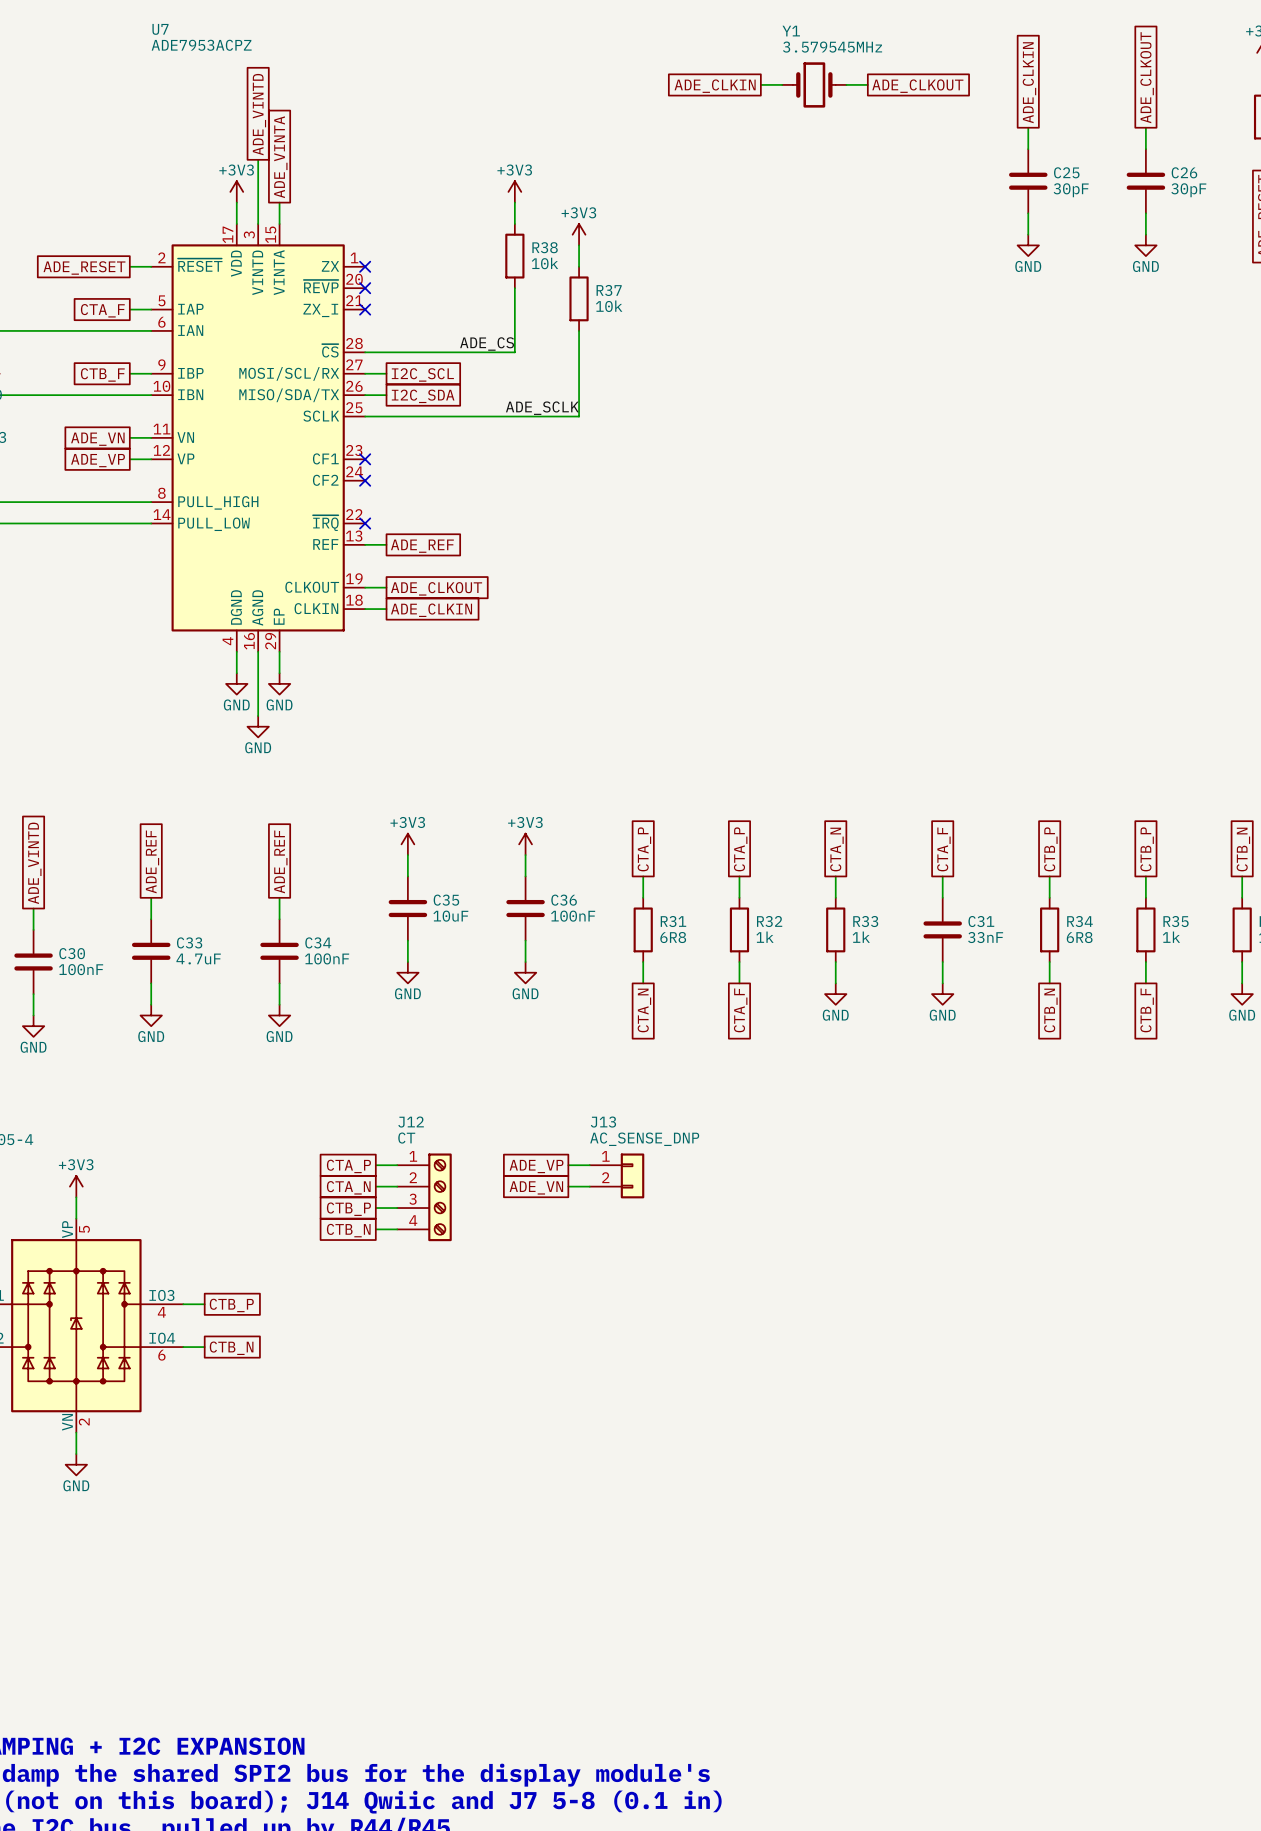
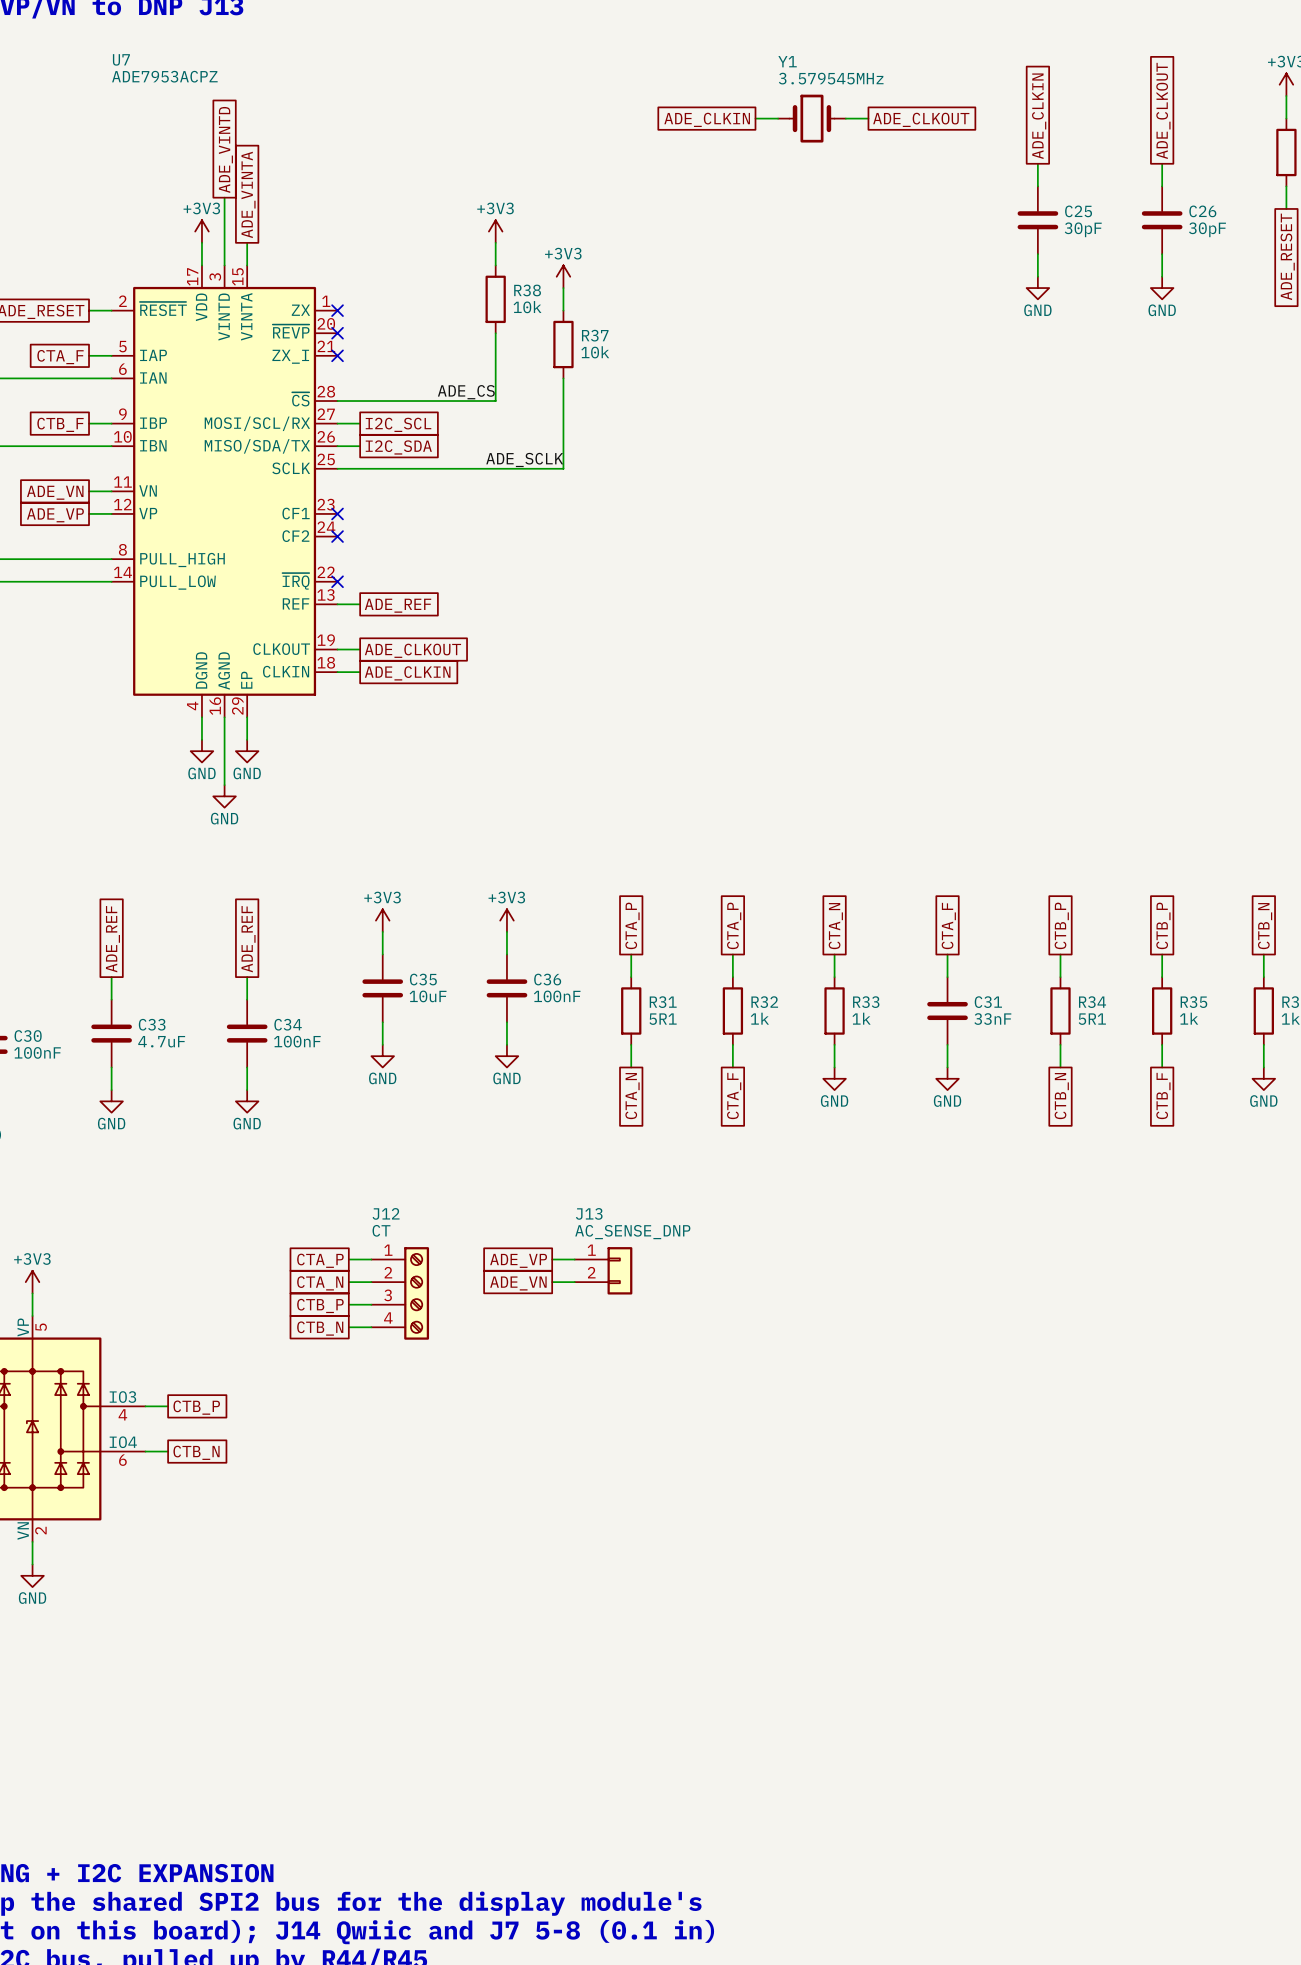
R31 value: 6R8 (673, 937) -> 5R1 (663, 1019)
R34 value: 6R8 (1079, 937) -> 5R1 (1092, 1019)

